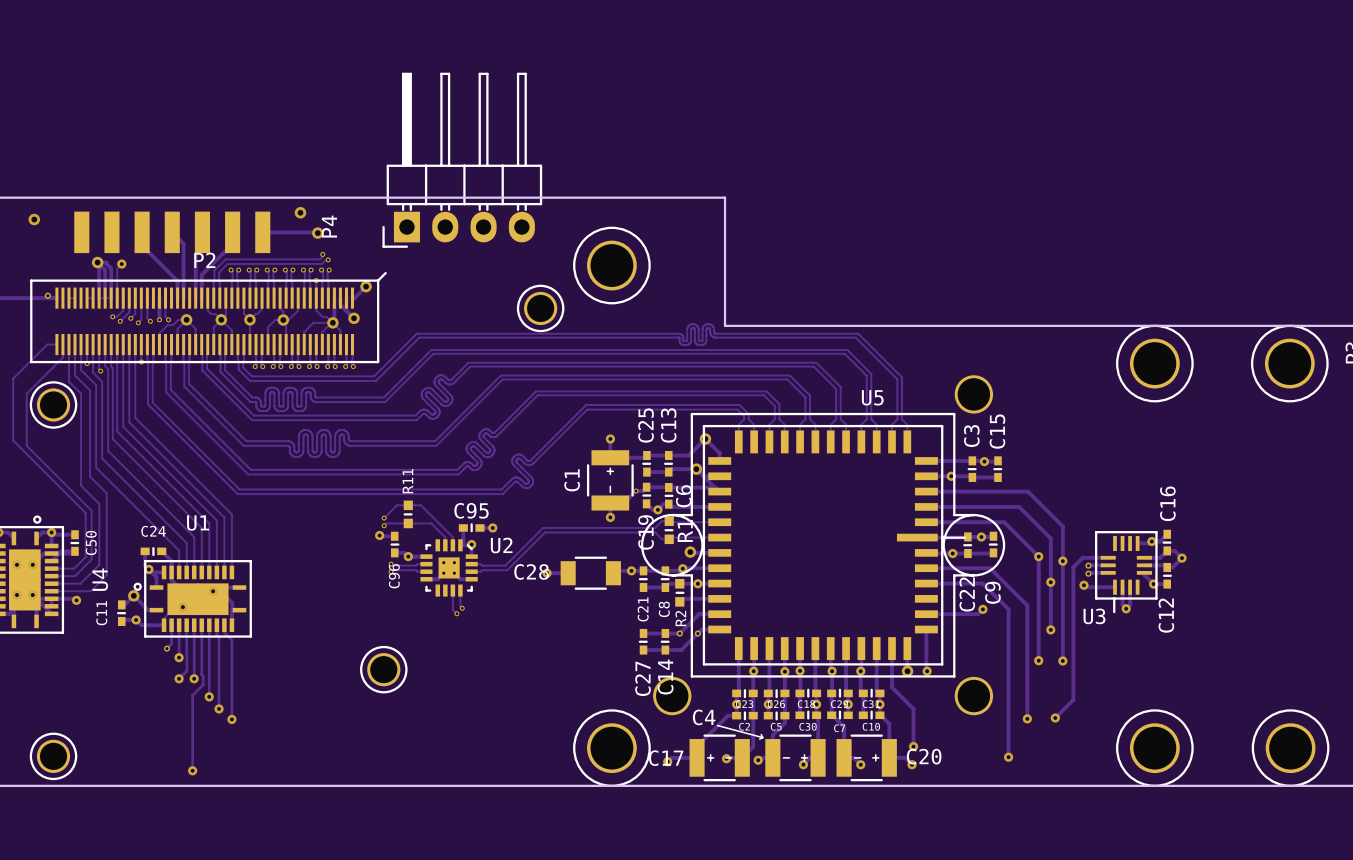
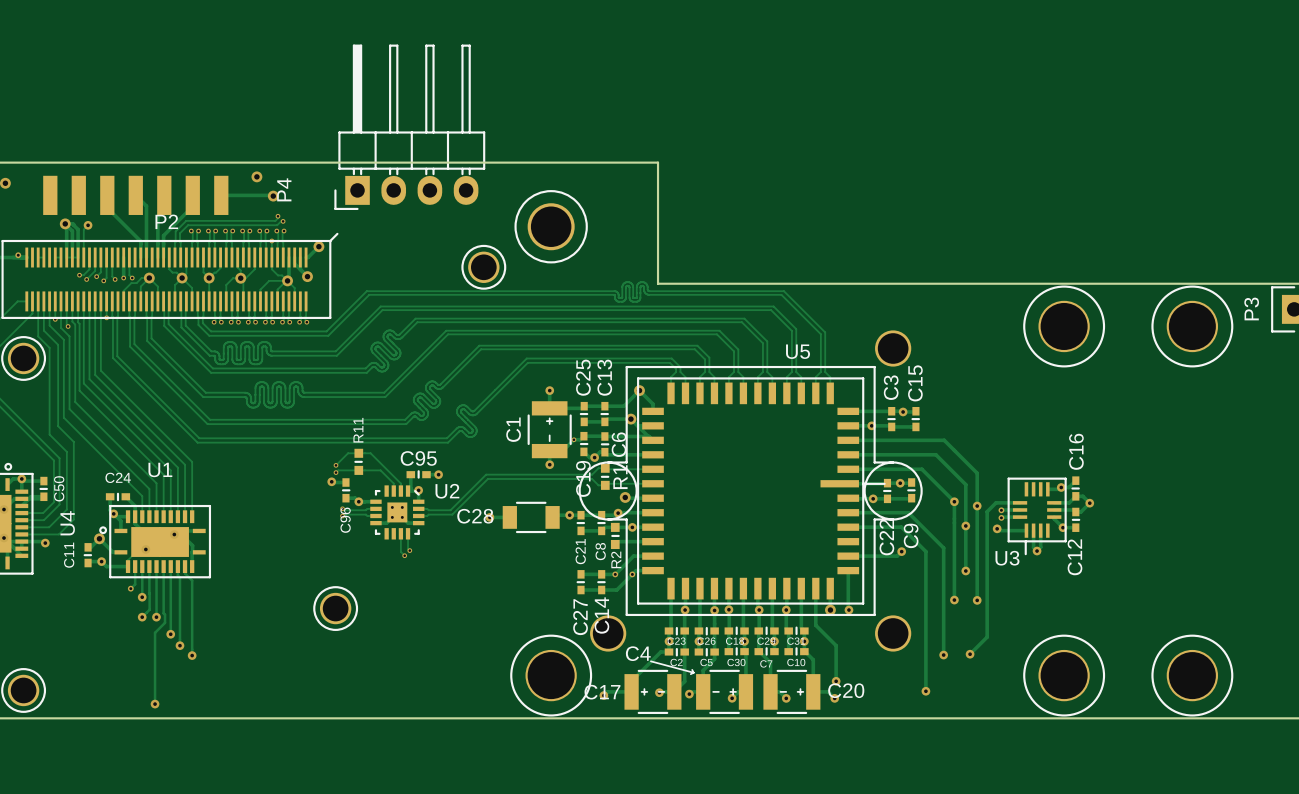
part footprint: [1116, 324, 1194, 403] -> [1023, 285, 1106, 368]
part footprint: [1251, 324, 1329, 403] -> [1151, 285, 1234, 368]
part footprint: [573, 709, 651, 787] -> [510, 634, 593, 717]
part footprint: [1116, 709, 1194, 787] -> [1023, 634, 1106, 717]
part footprint: [1251, 709, 1330, 787] -> [1151, 634, 1234, 717]

